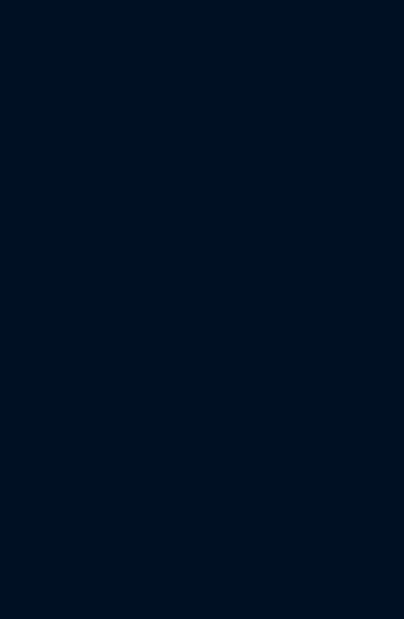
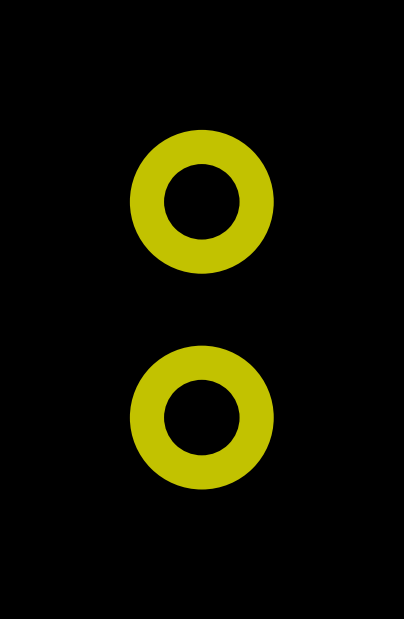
part: none -> (201, 201)
part: none -> (201, 417)

